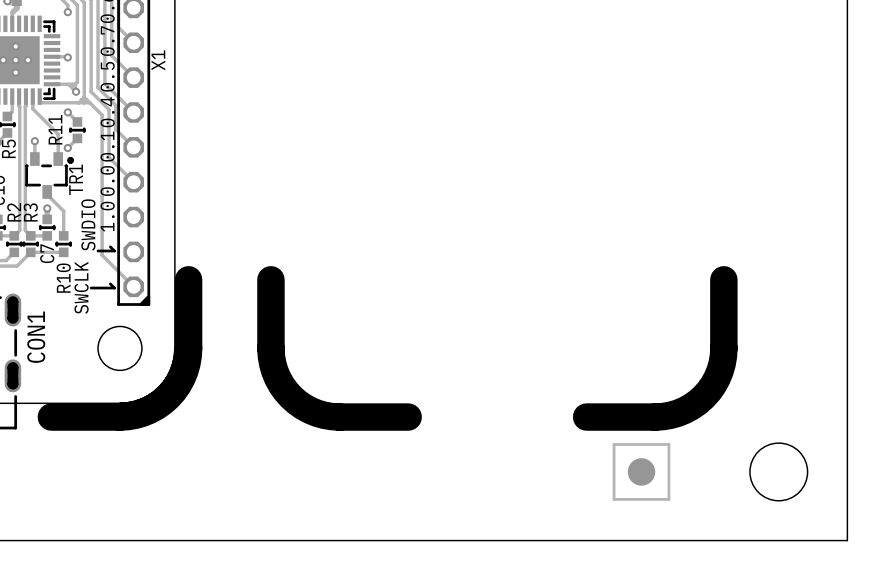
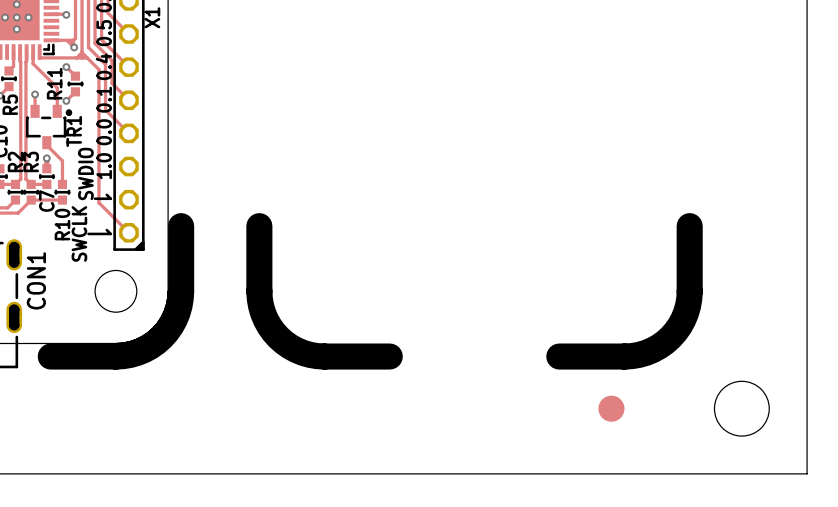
part footprint: [612, 443, 671, 501] -> [598, 395, 625, 422]

